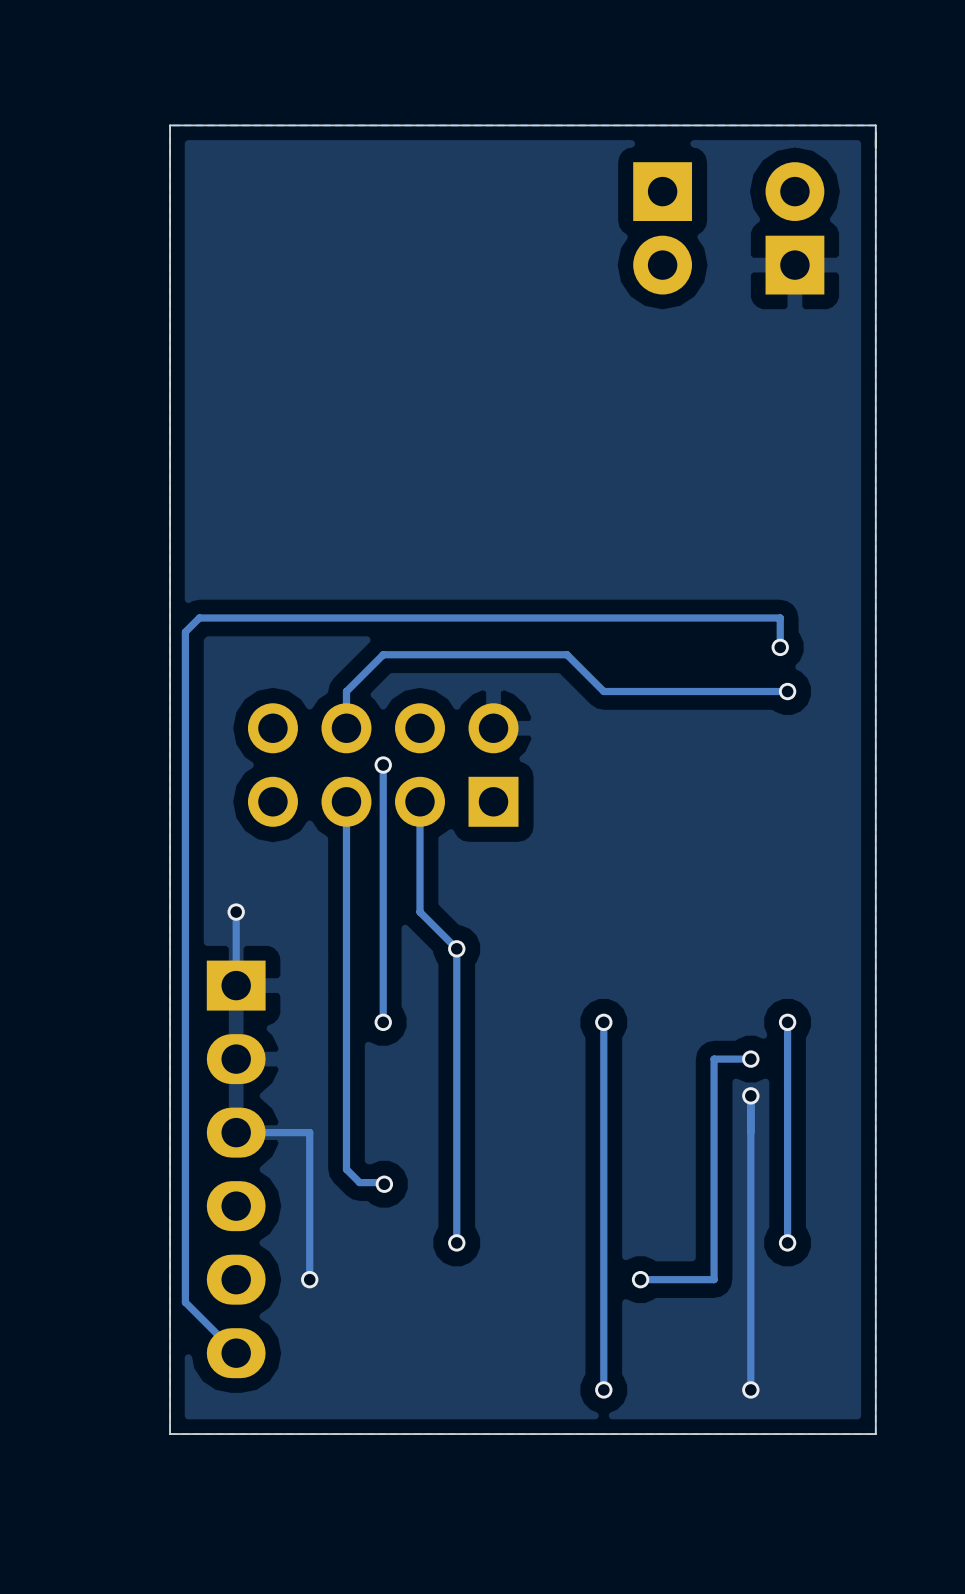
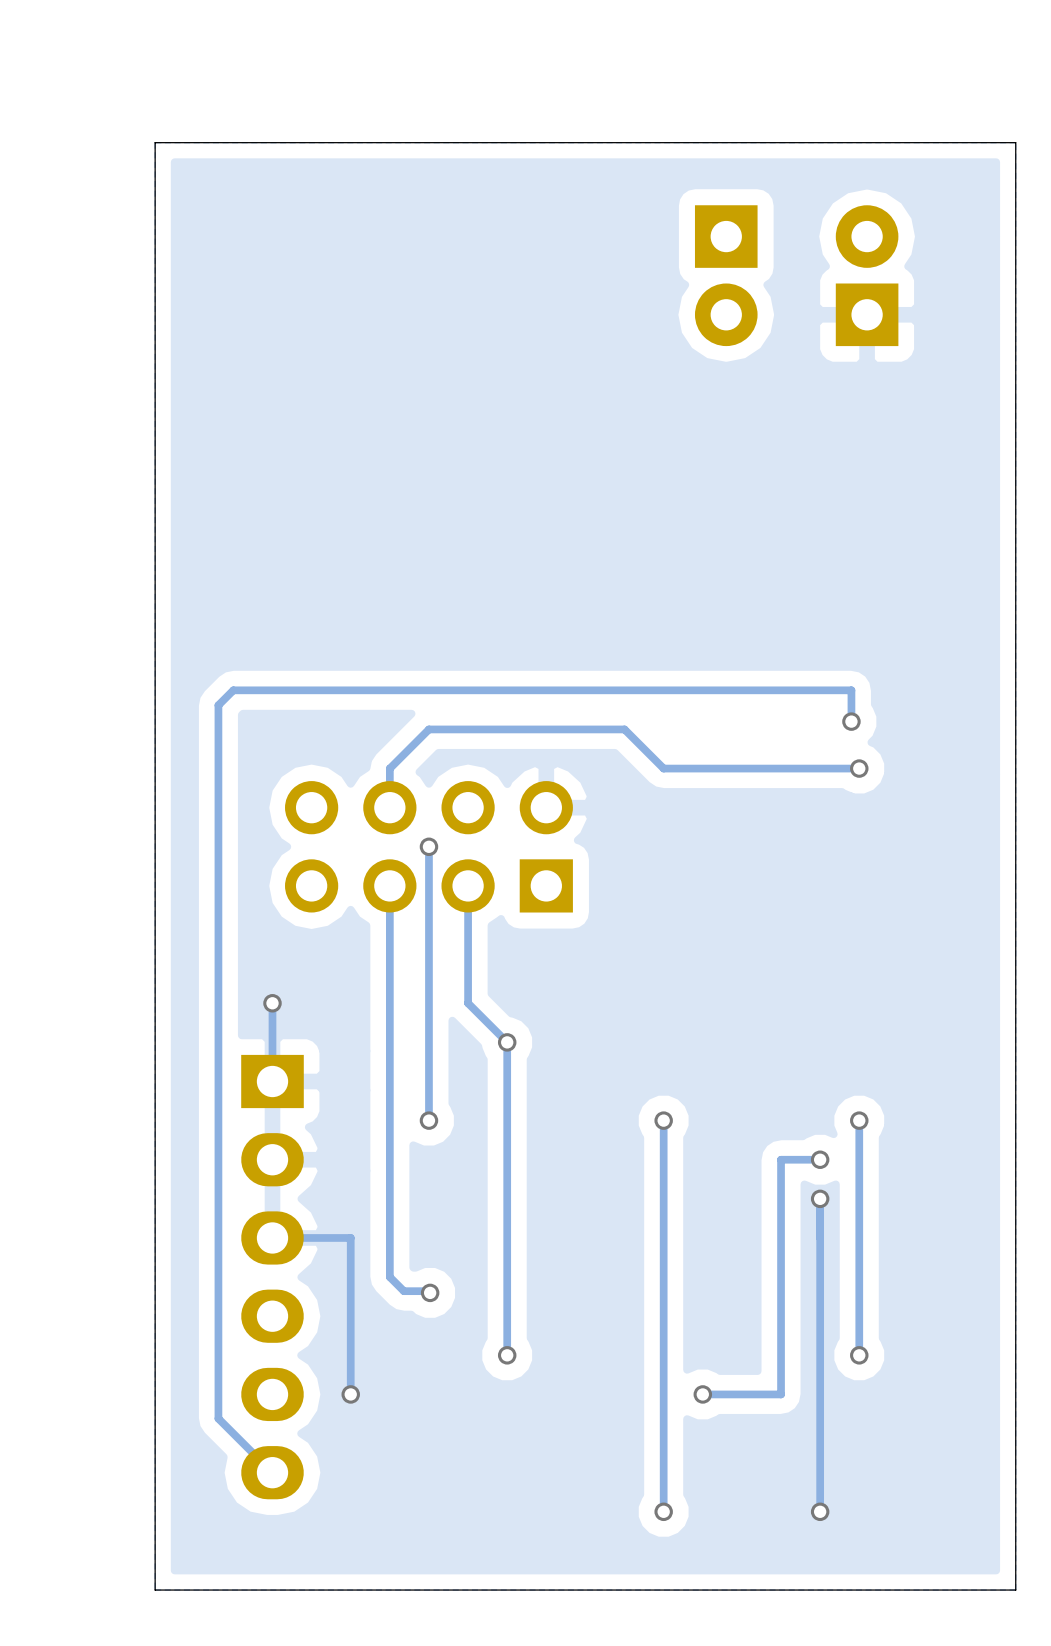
board edge: (875, 125) (875, 1434) (170, 1434) (170, 125) (875, 125) -> (1015, 142) (1015, 1590) (155, 1590) (155, 142) (1015, 142)

